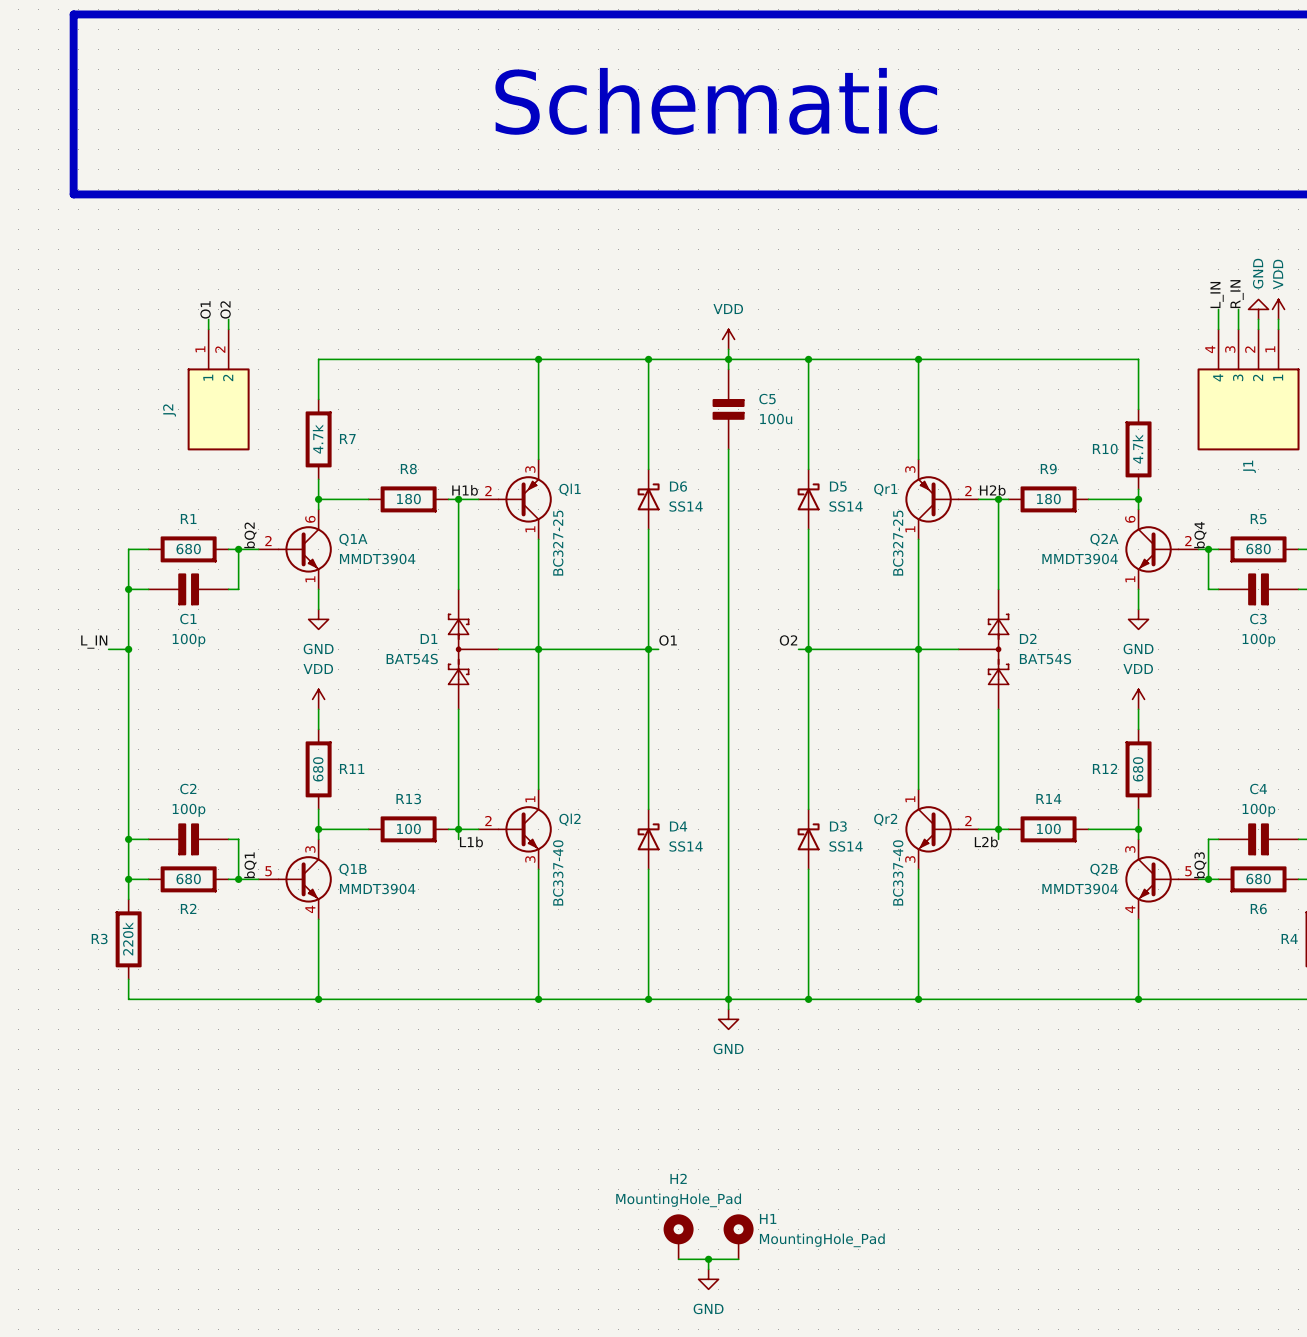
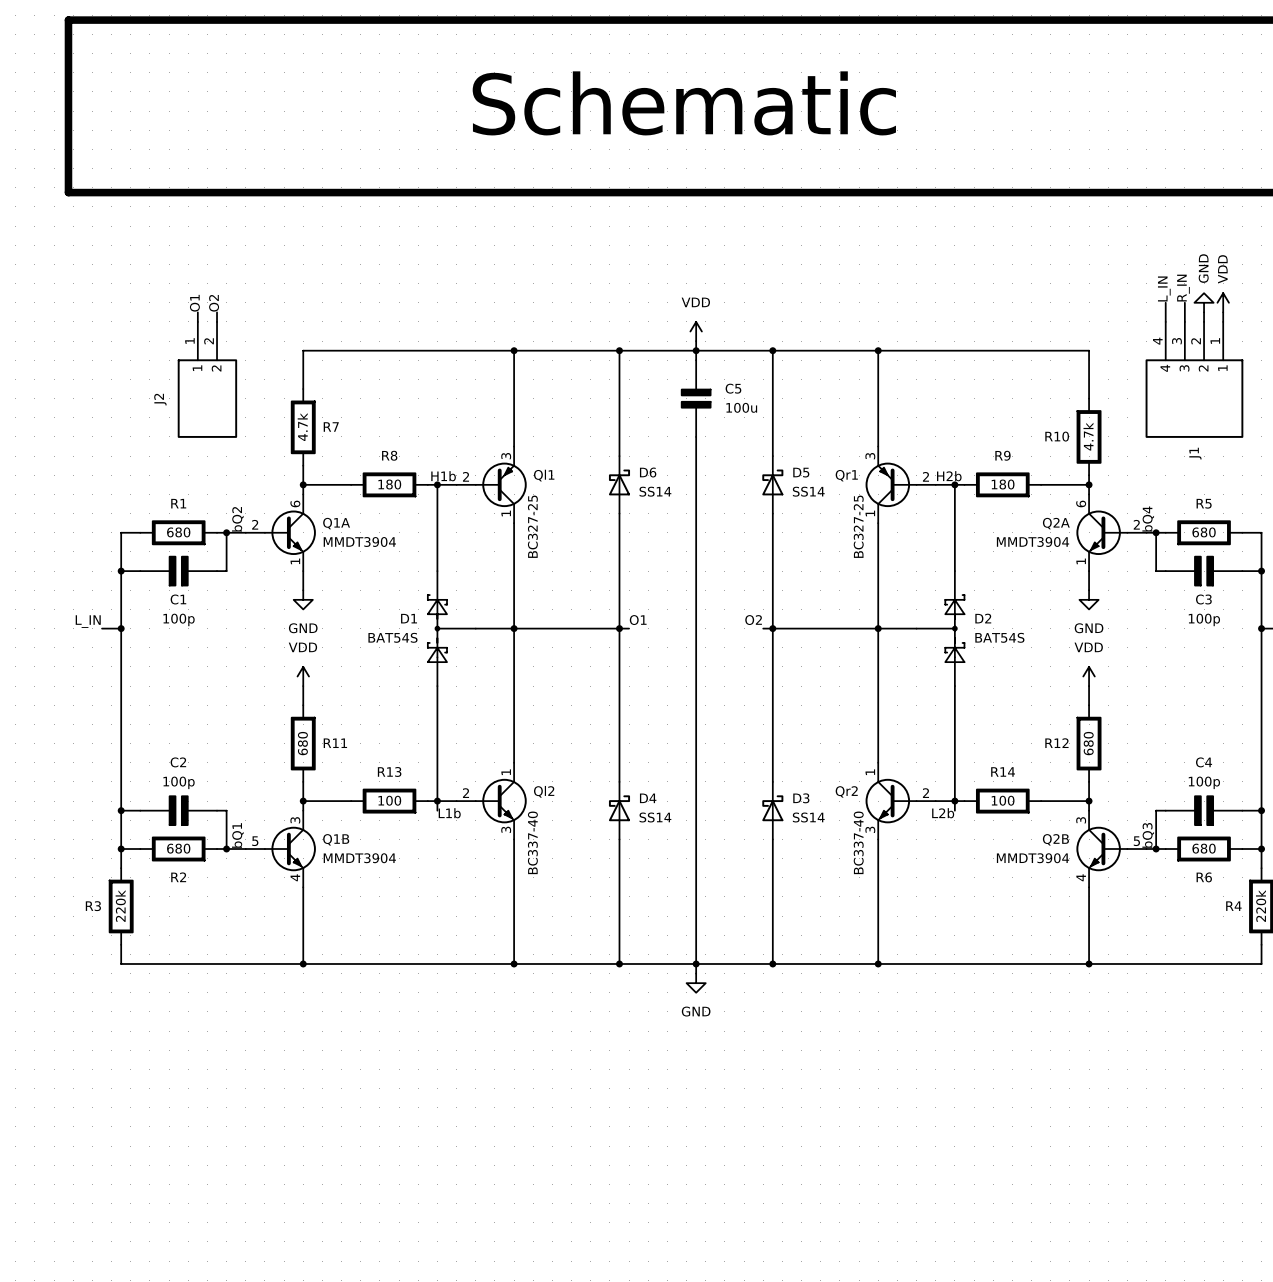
H2: MountingHole_Pad (678, 1236) -> none
H1: MountingHole_Pad (738, 1236) -> none
wire: (678, 1259) (738, 1259) -> none
wire: (708, 1259) (708, 1269) -> none
junction: (708, 1259) -> none
power symbol: GND (708, 1279) -> none

